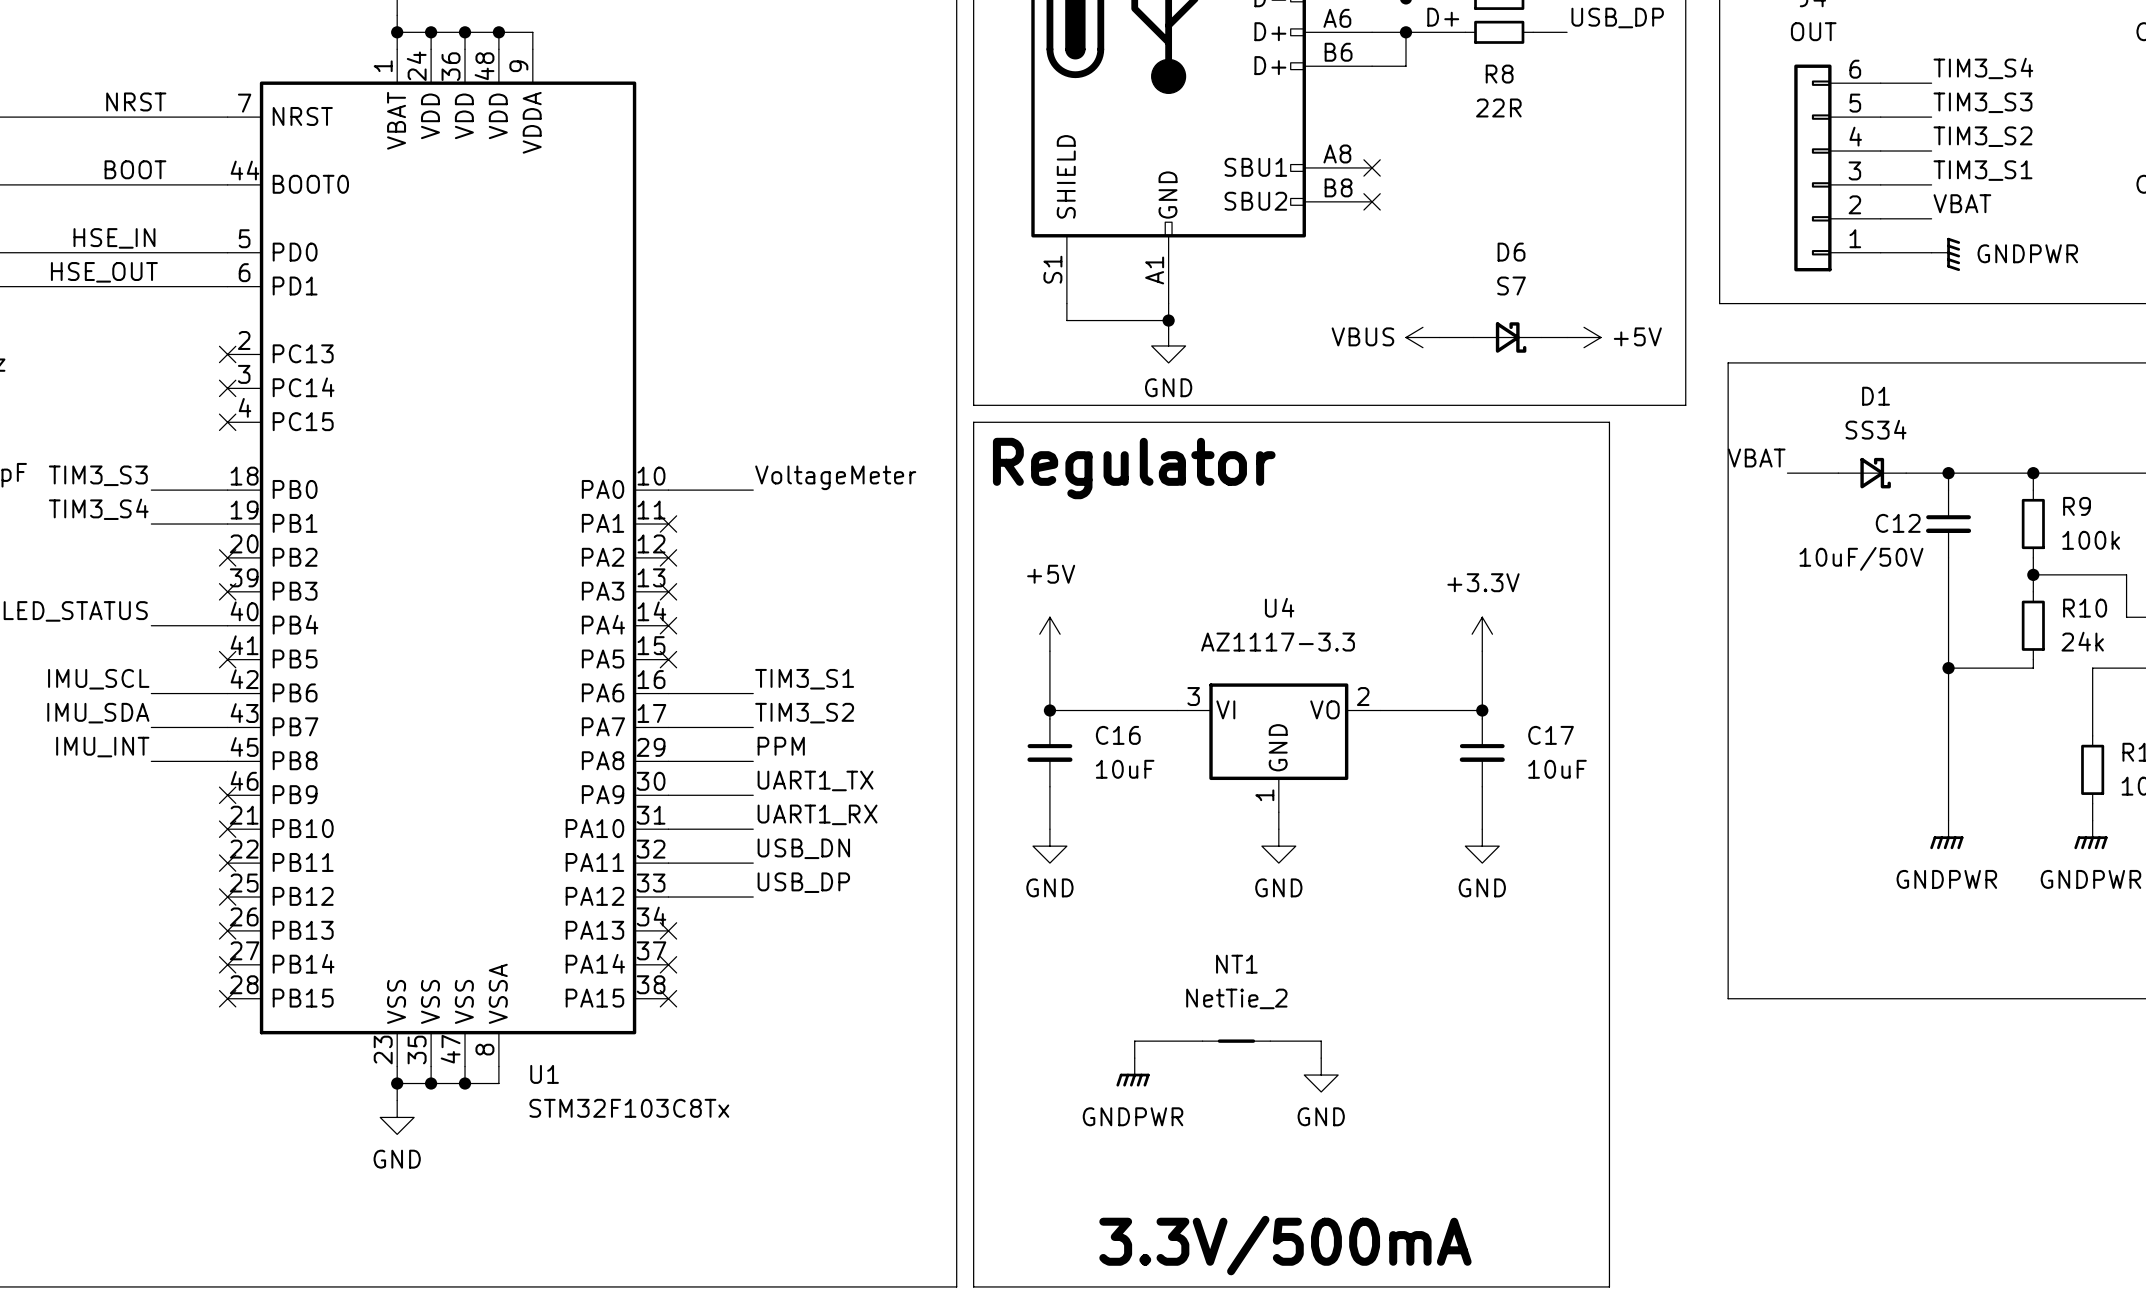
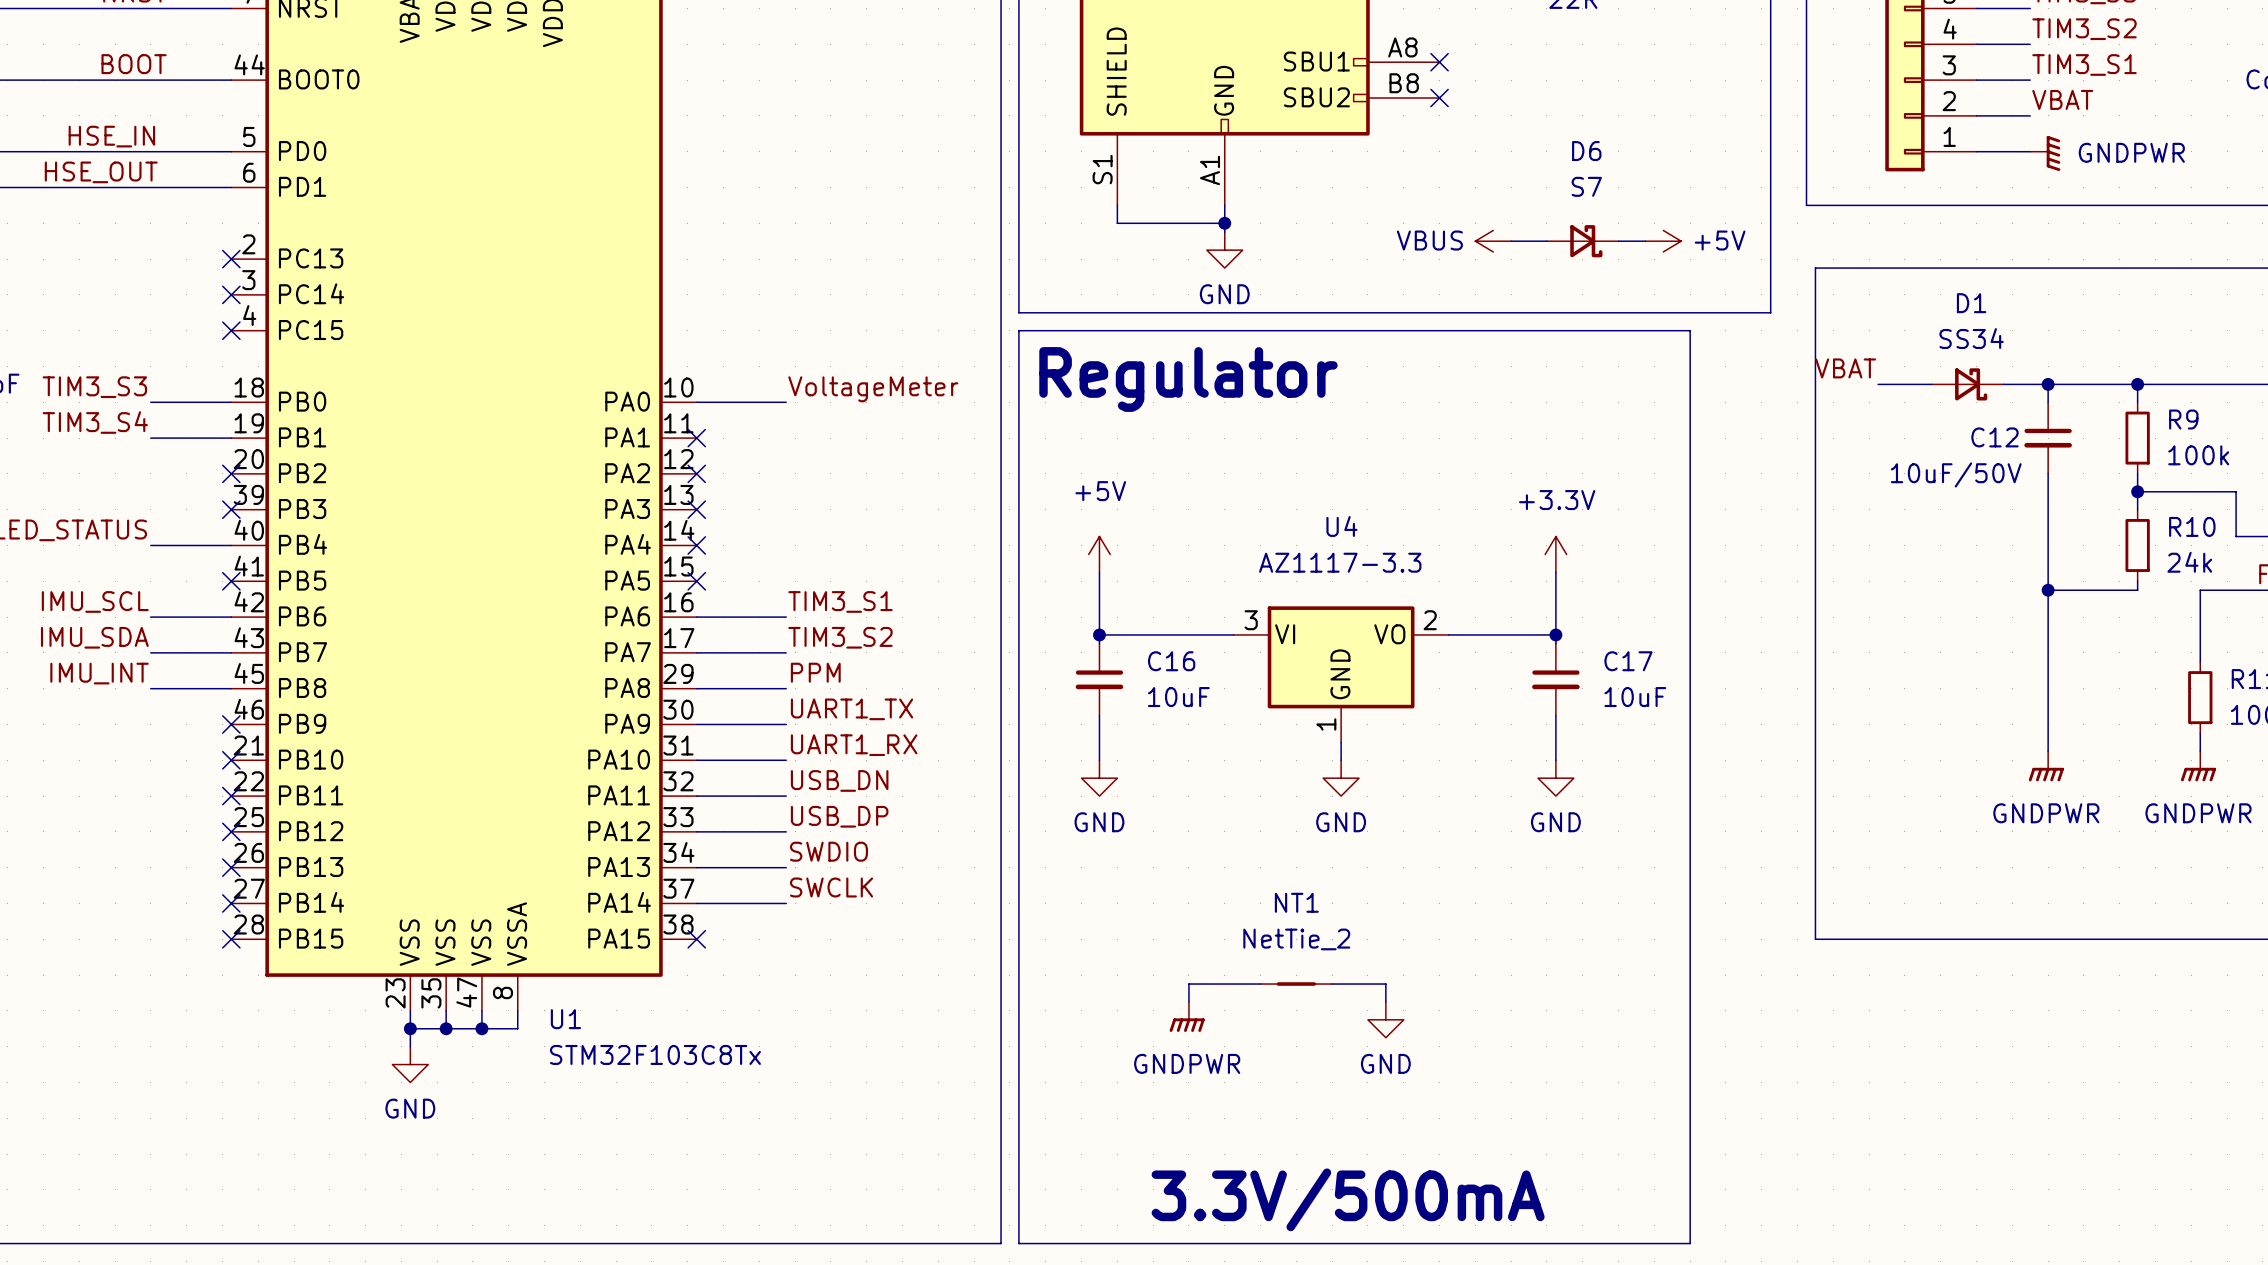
label: none -> SWDIO (828, 851)
wire: none -> (696, 867) (786, 867)
no-connect mark: (668, 930) -> none
label: none -> SWCLK (831, 887)
wire: none -> (696, 903) (786, 903)
no-connect mark: (668, 964) -> none

